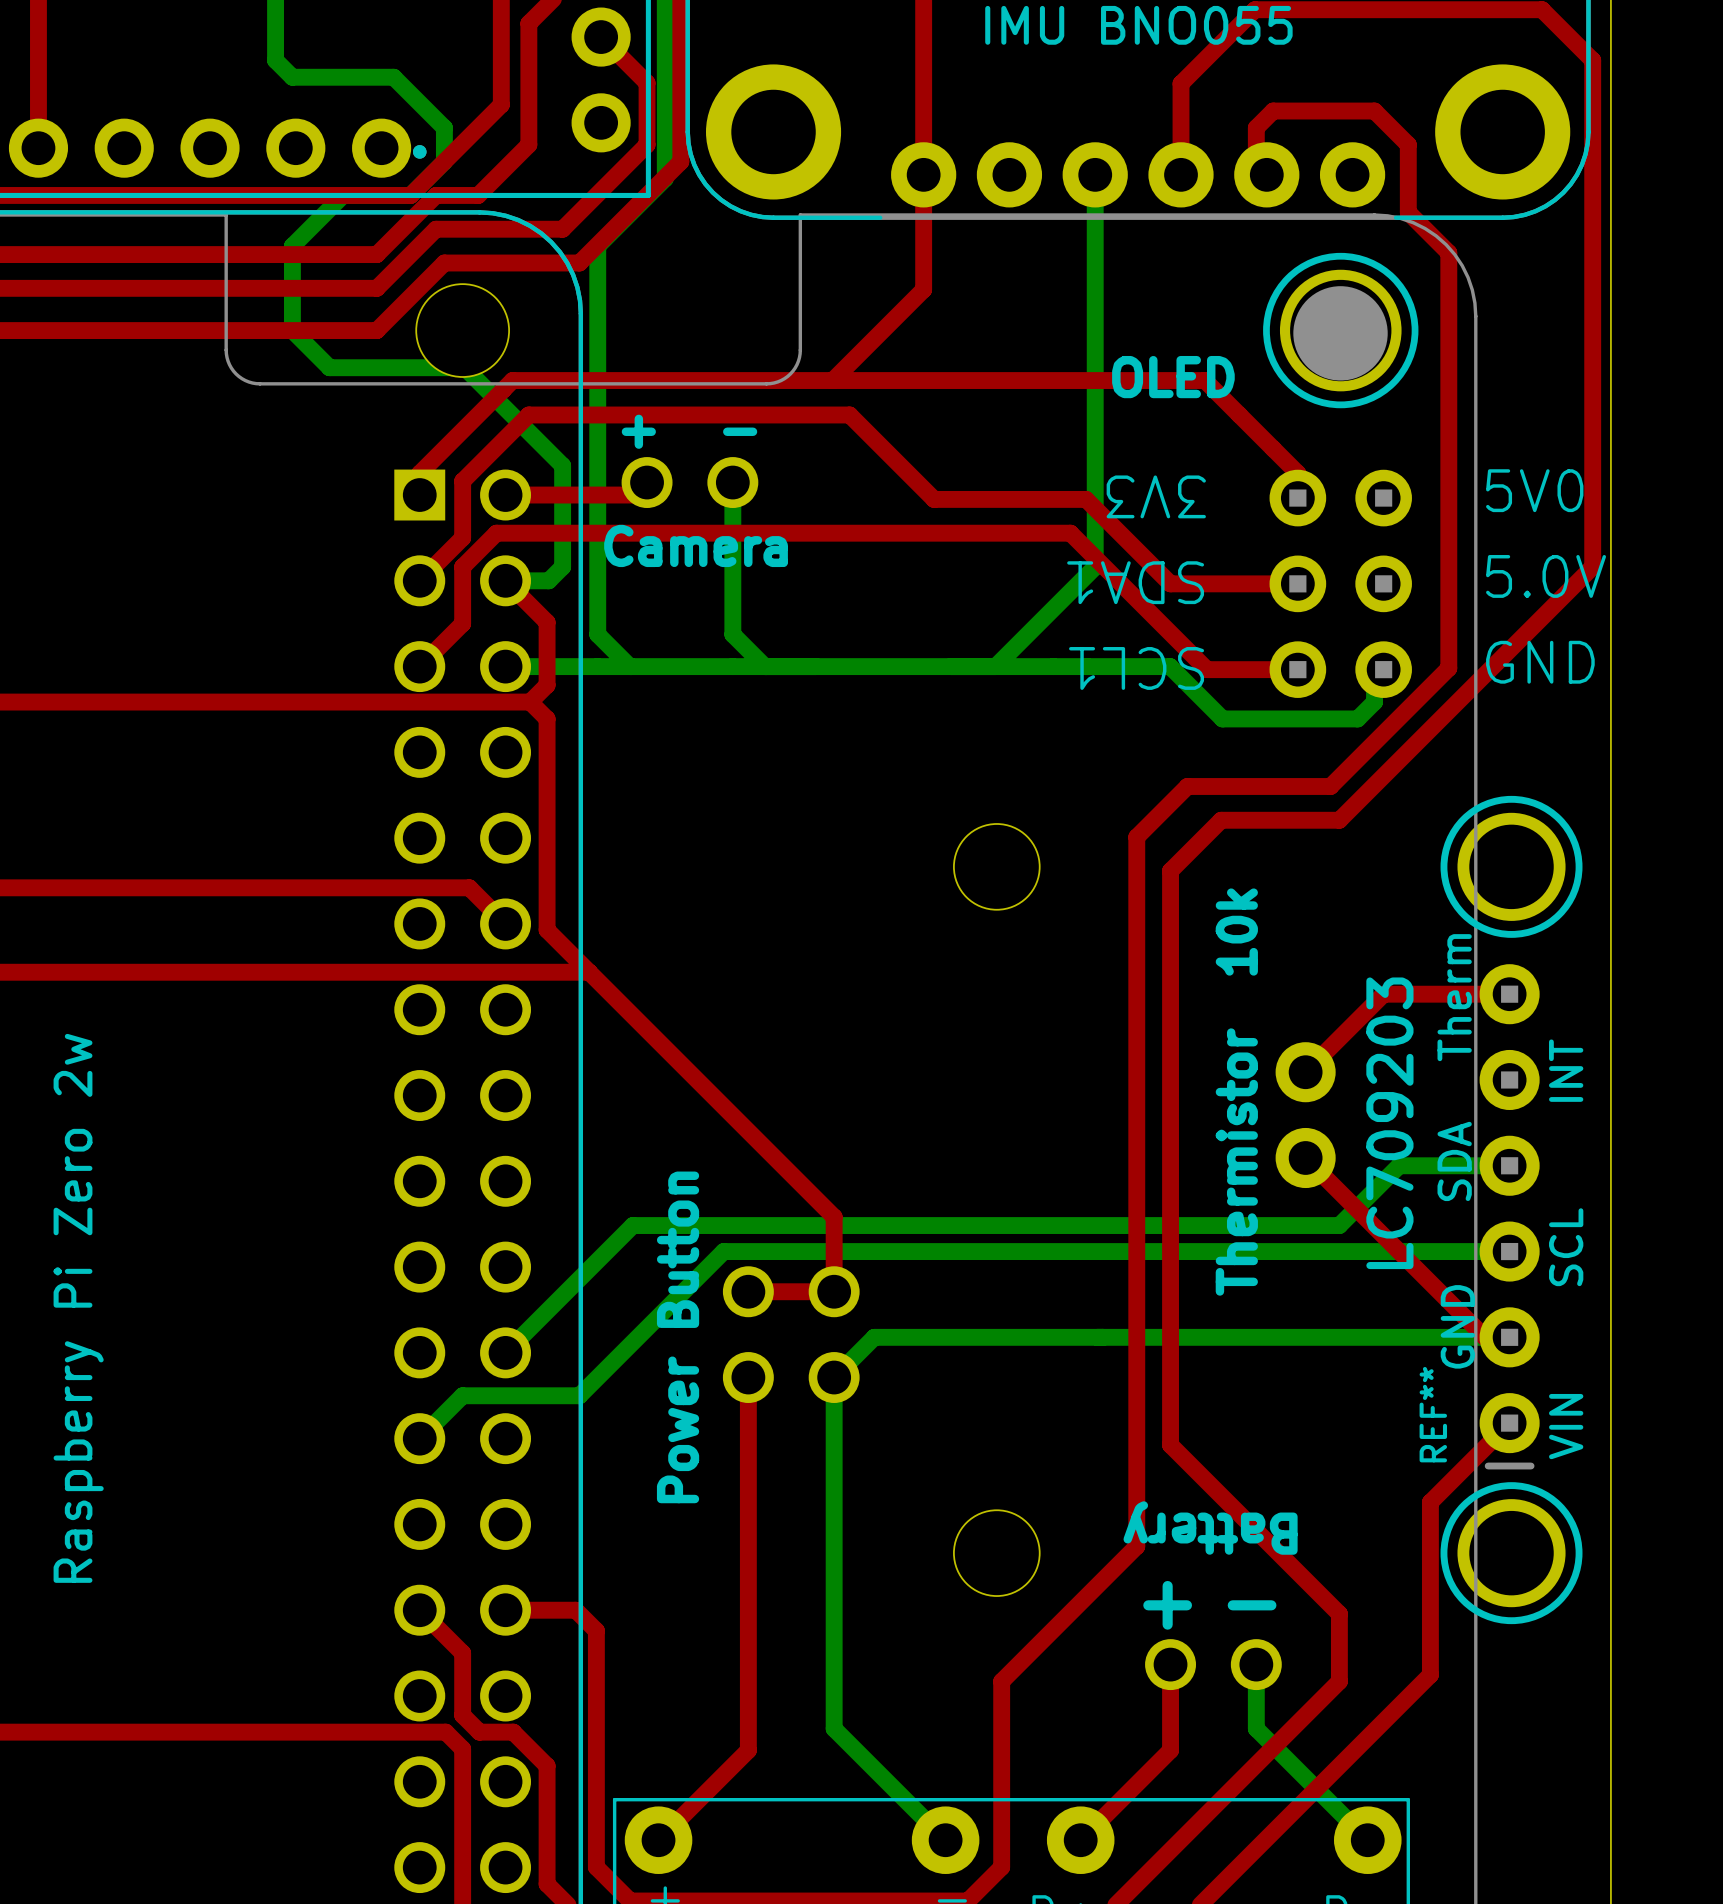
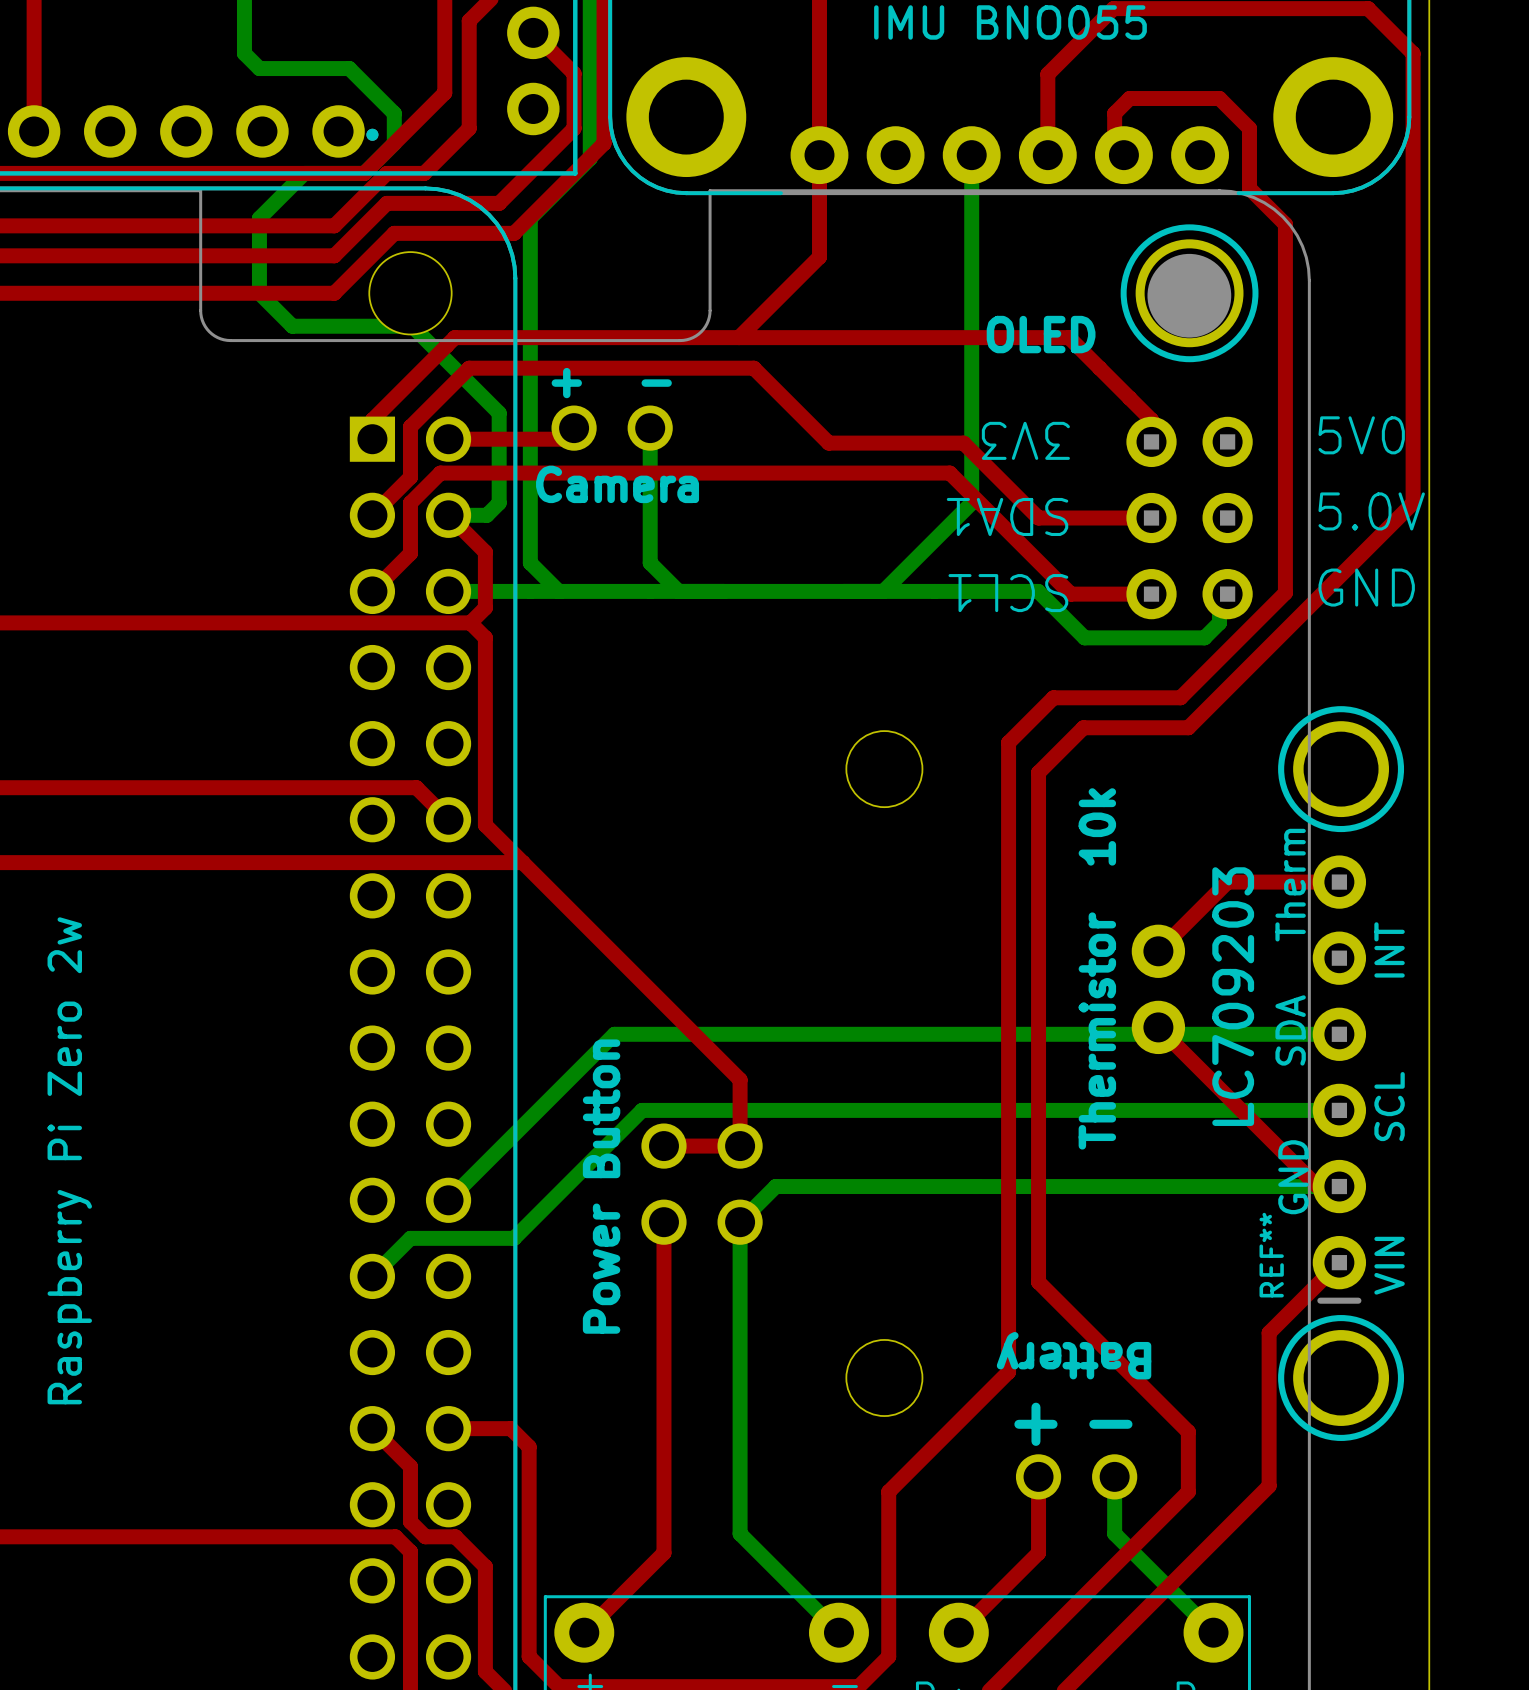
bottom track: (1399, 1165) (1339, 1225) (632, 1225) -> (1241, 1034) (614, 1034) (561, 1087)

